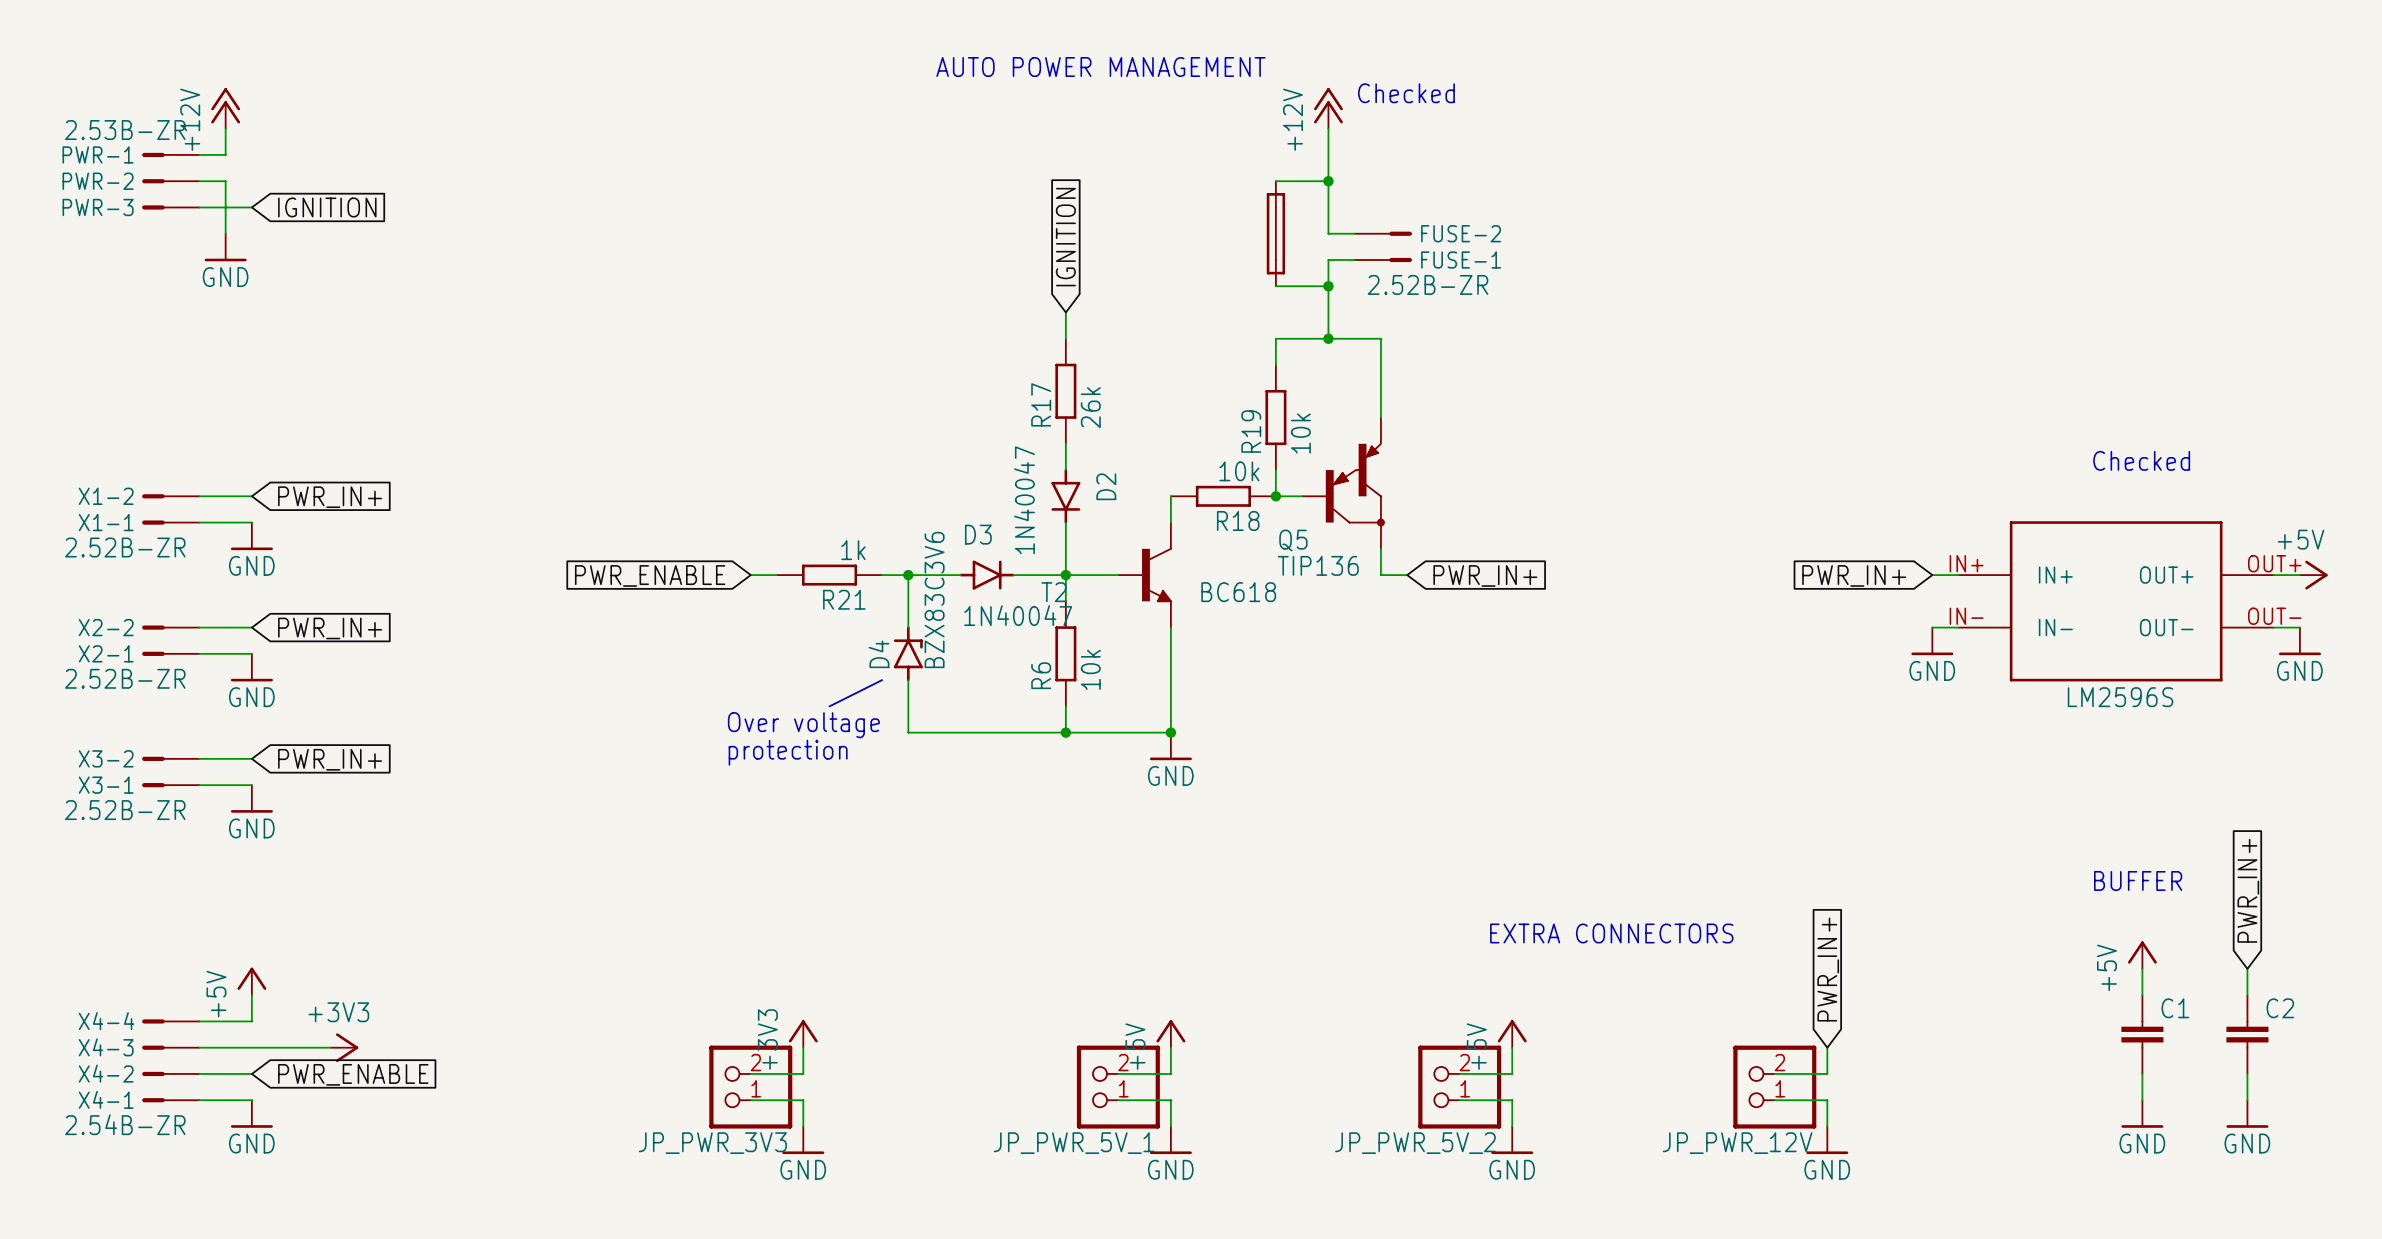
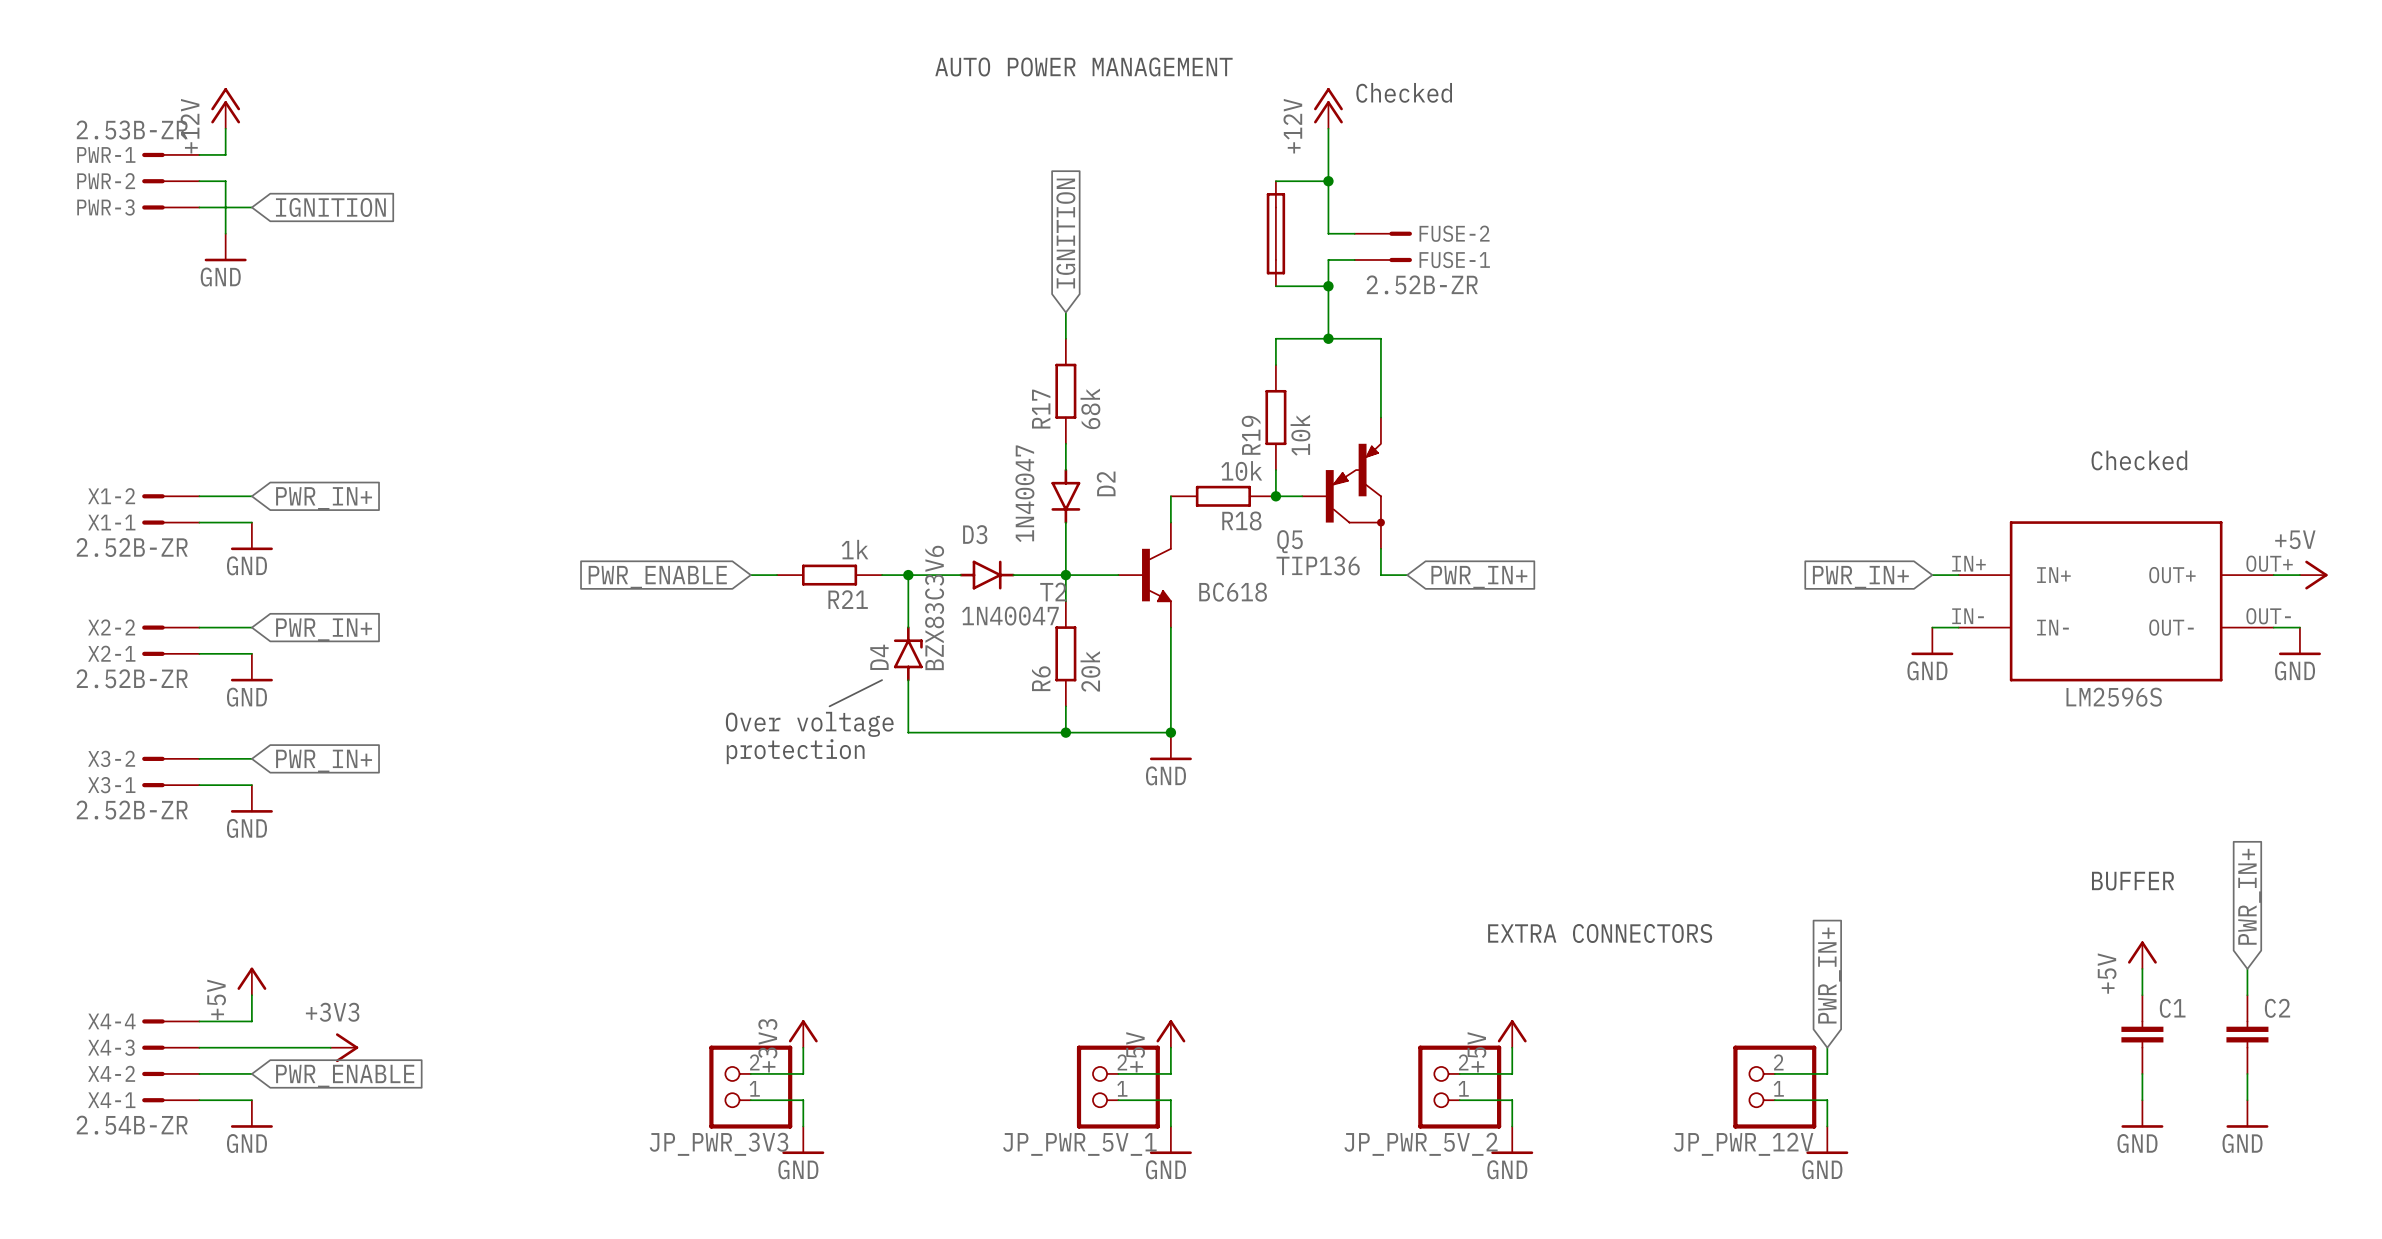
R17 value: 26k (1090, 407) -> 68k (1090, 408)
R6 value: 10k (1090, 669) -> 20k (1090, 671)

